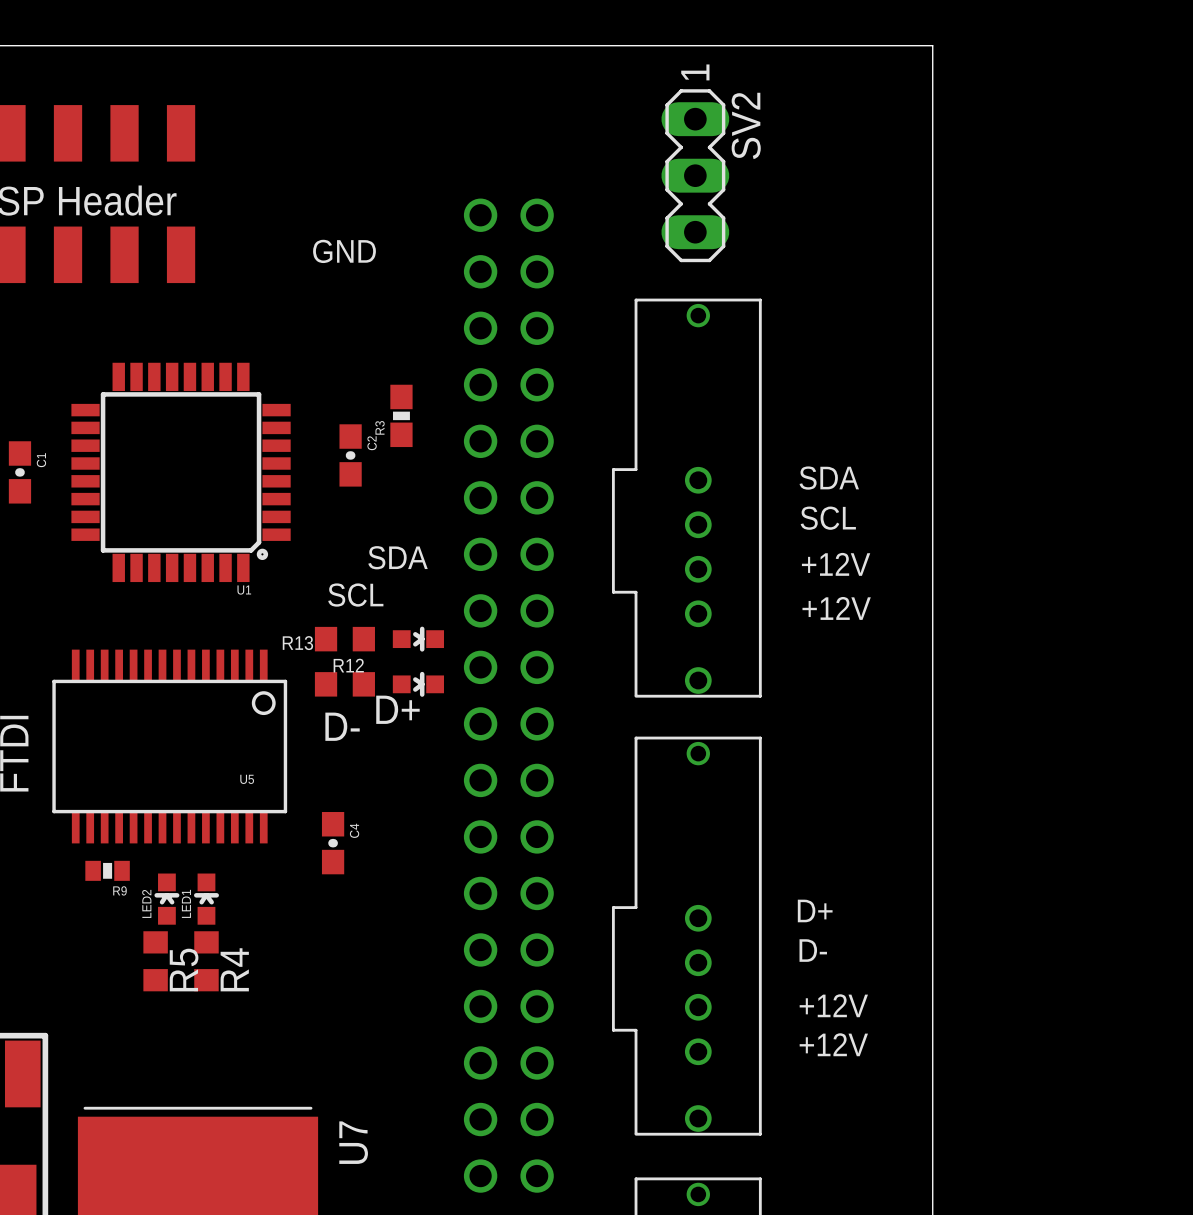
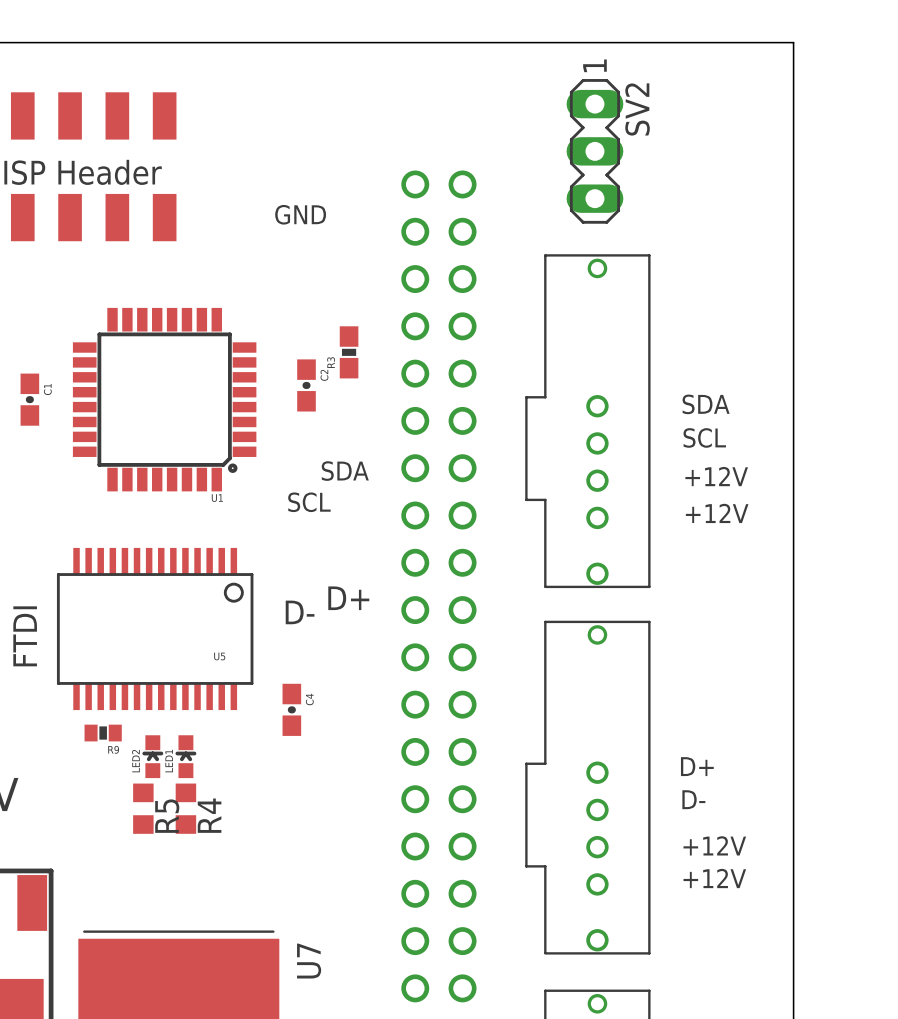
R13: (344, 639) -> none
part: (418, 639) -> none
R12: (344, 684) -> none
part: (418, 684) -> none

